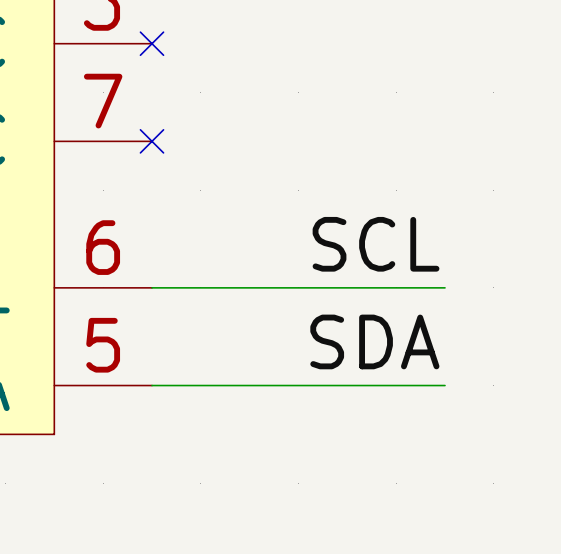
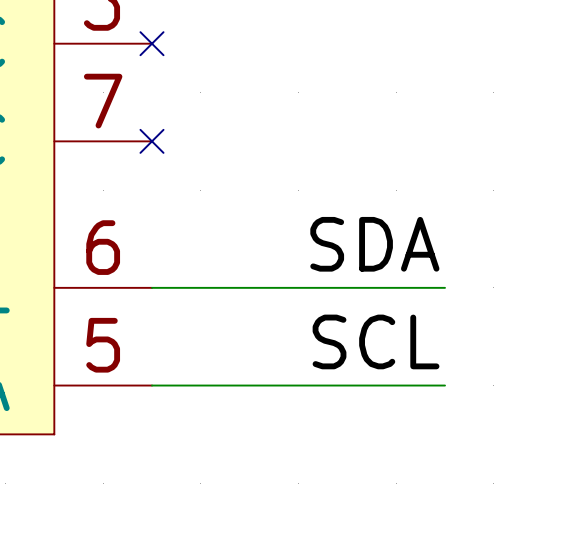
label: SCL (376, 244) -> SDA (374, 244)
label: SDA (374, 341) -> SCL (376, 341)

